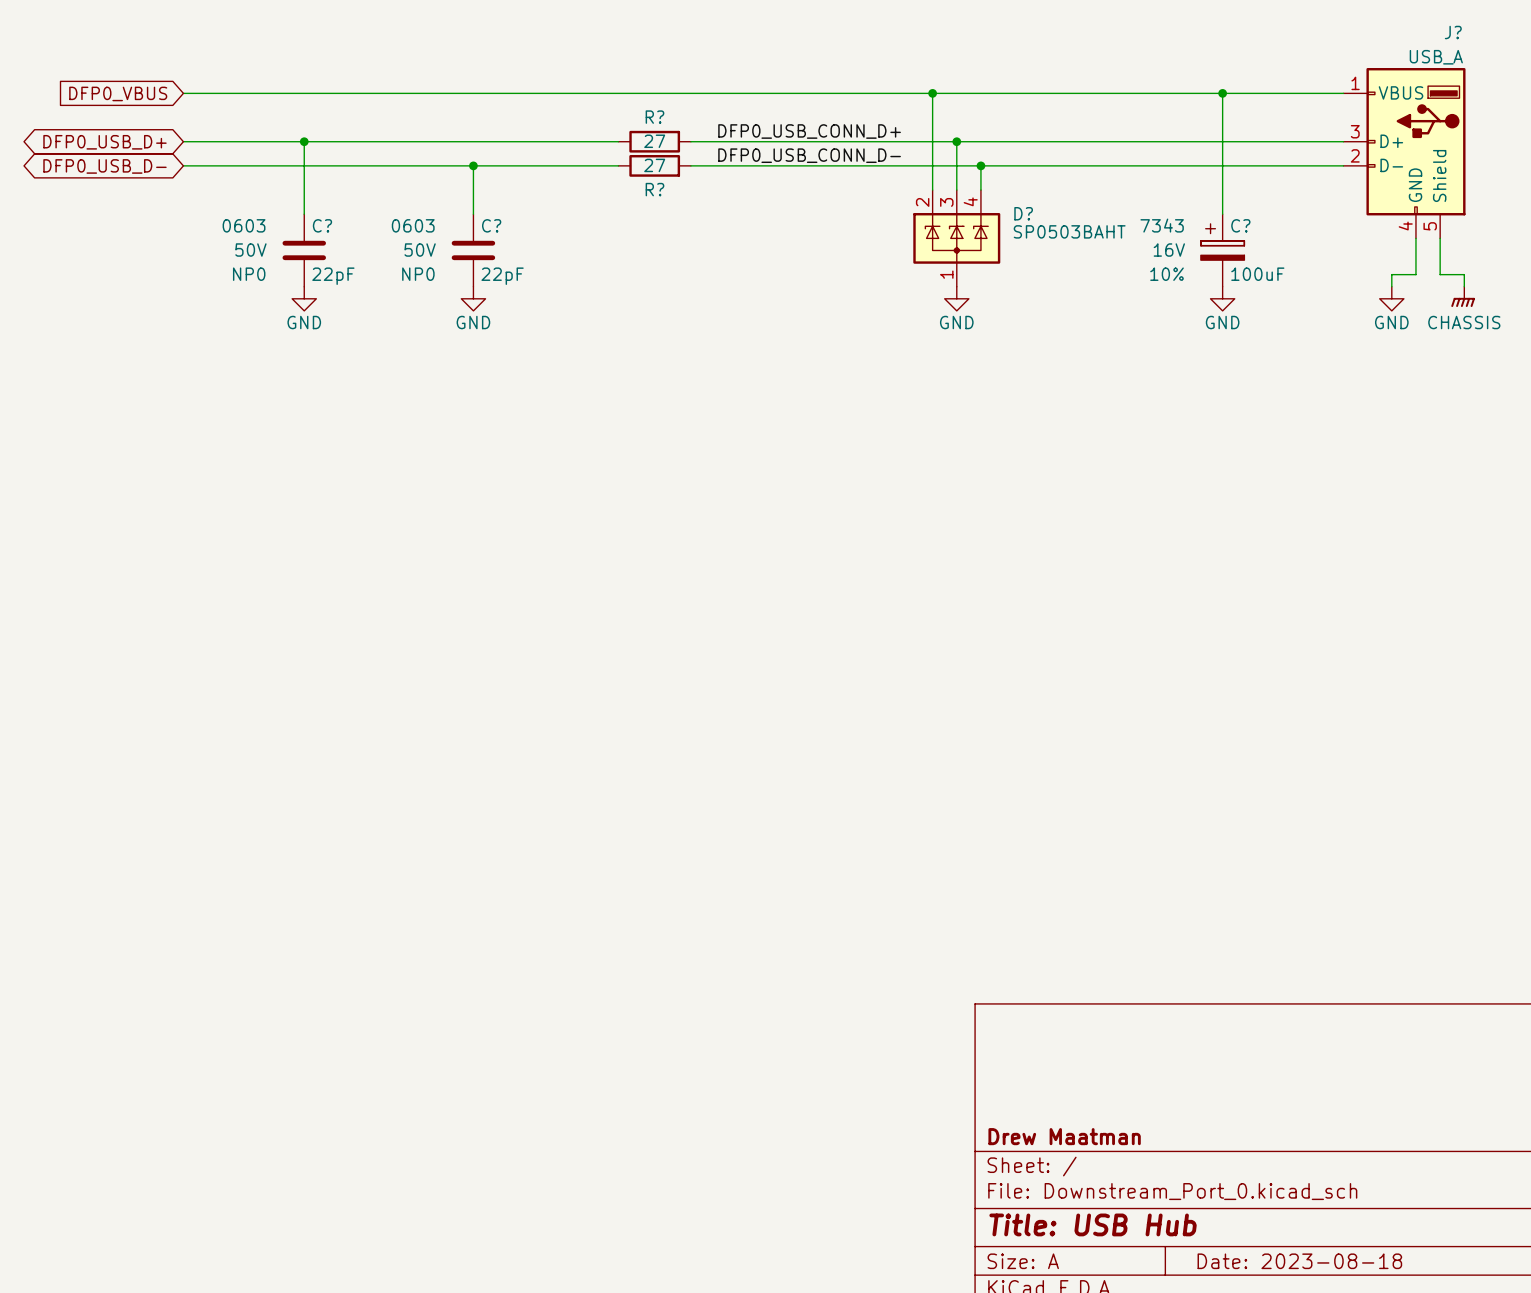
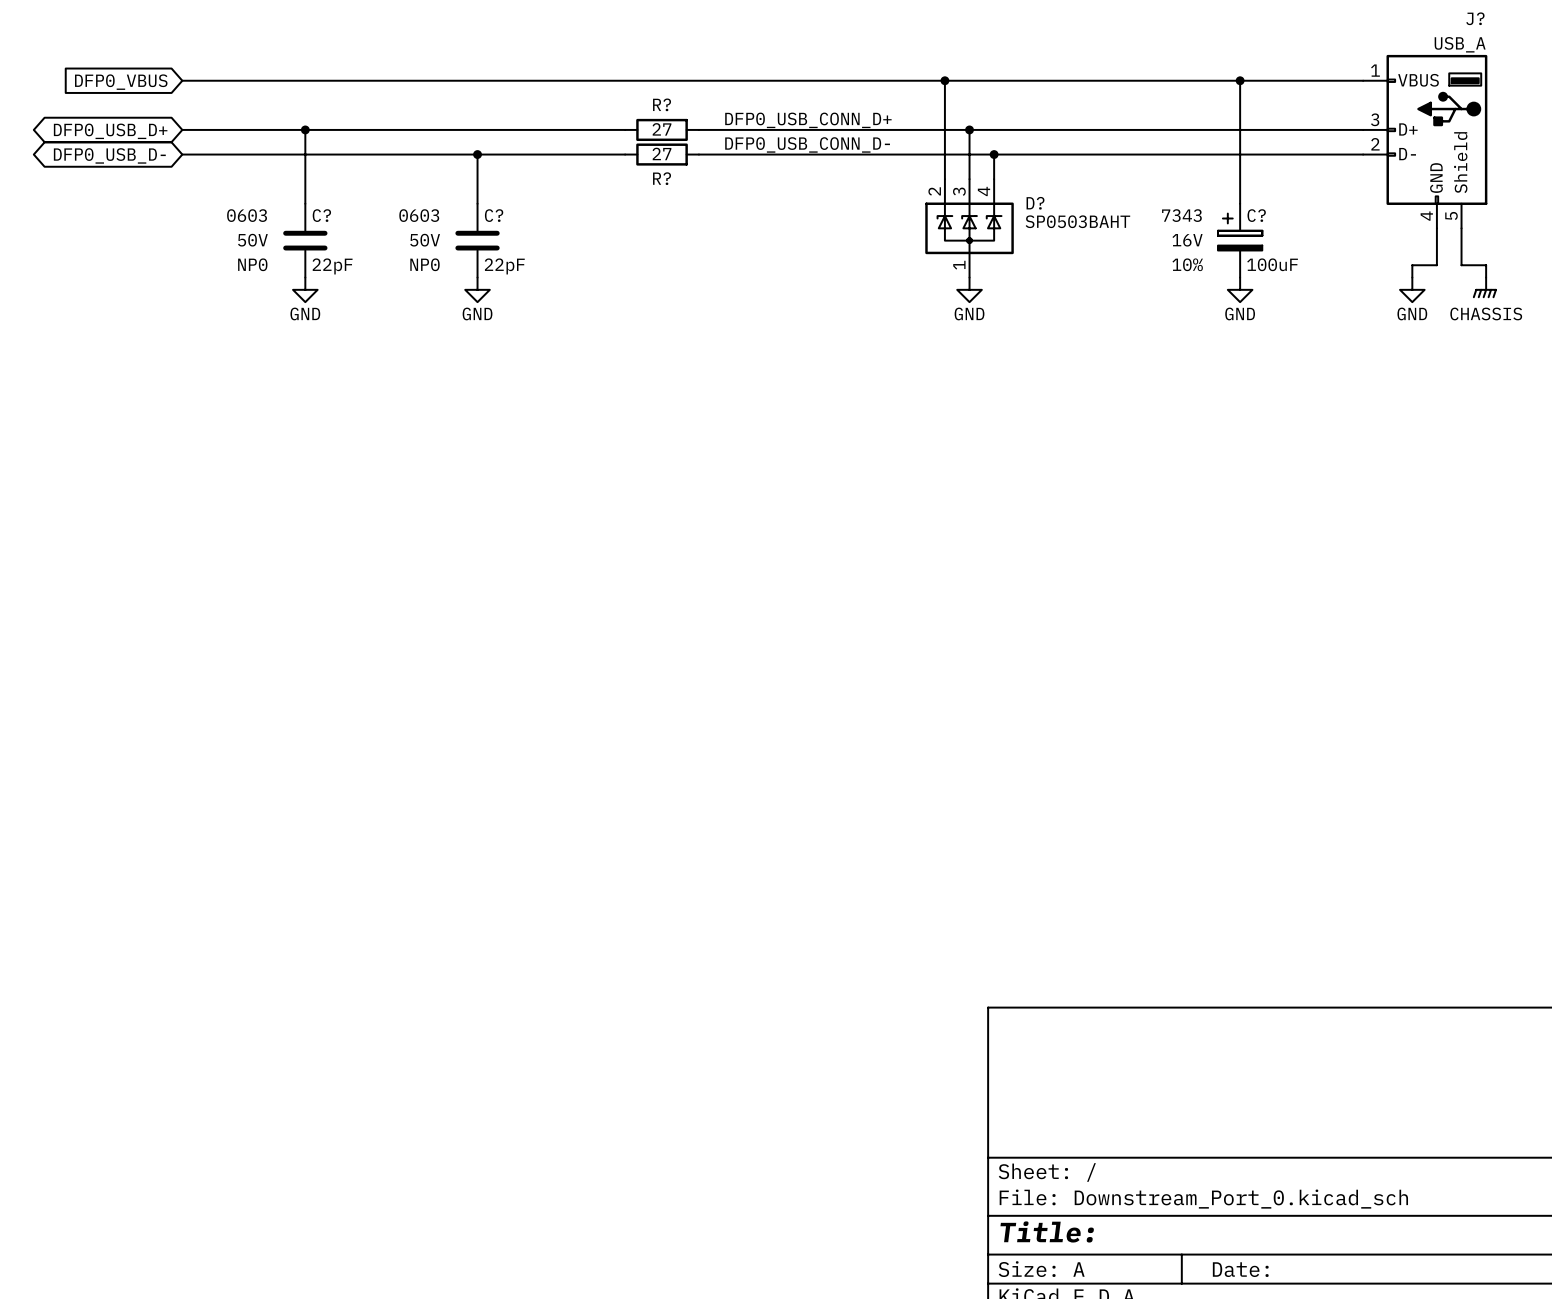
title block: Drew Maatman (1064, 1136) -> none
title block: Title: USB Hub (1093, 1224) -> Title: (1047, 1231)
title block: Date: 2023-08-18 (1299, 1261) -> Date: (1240, 1269)

